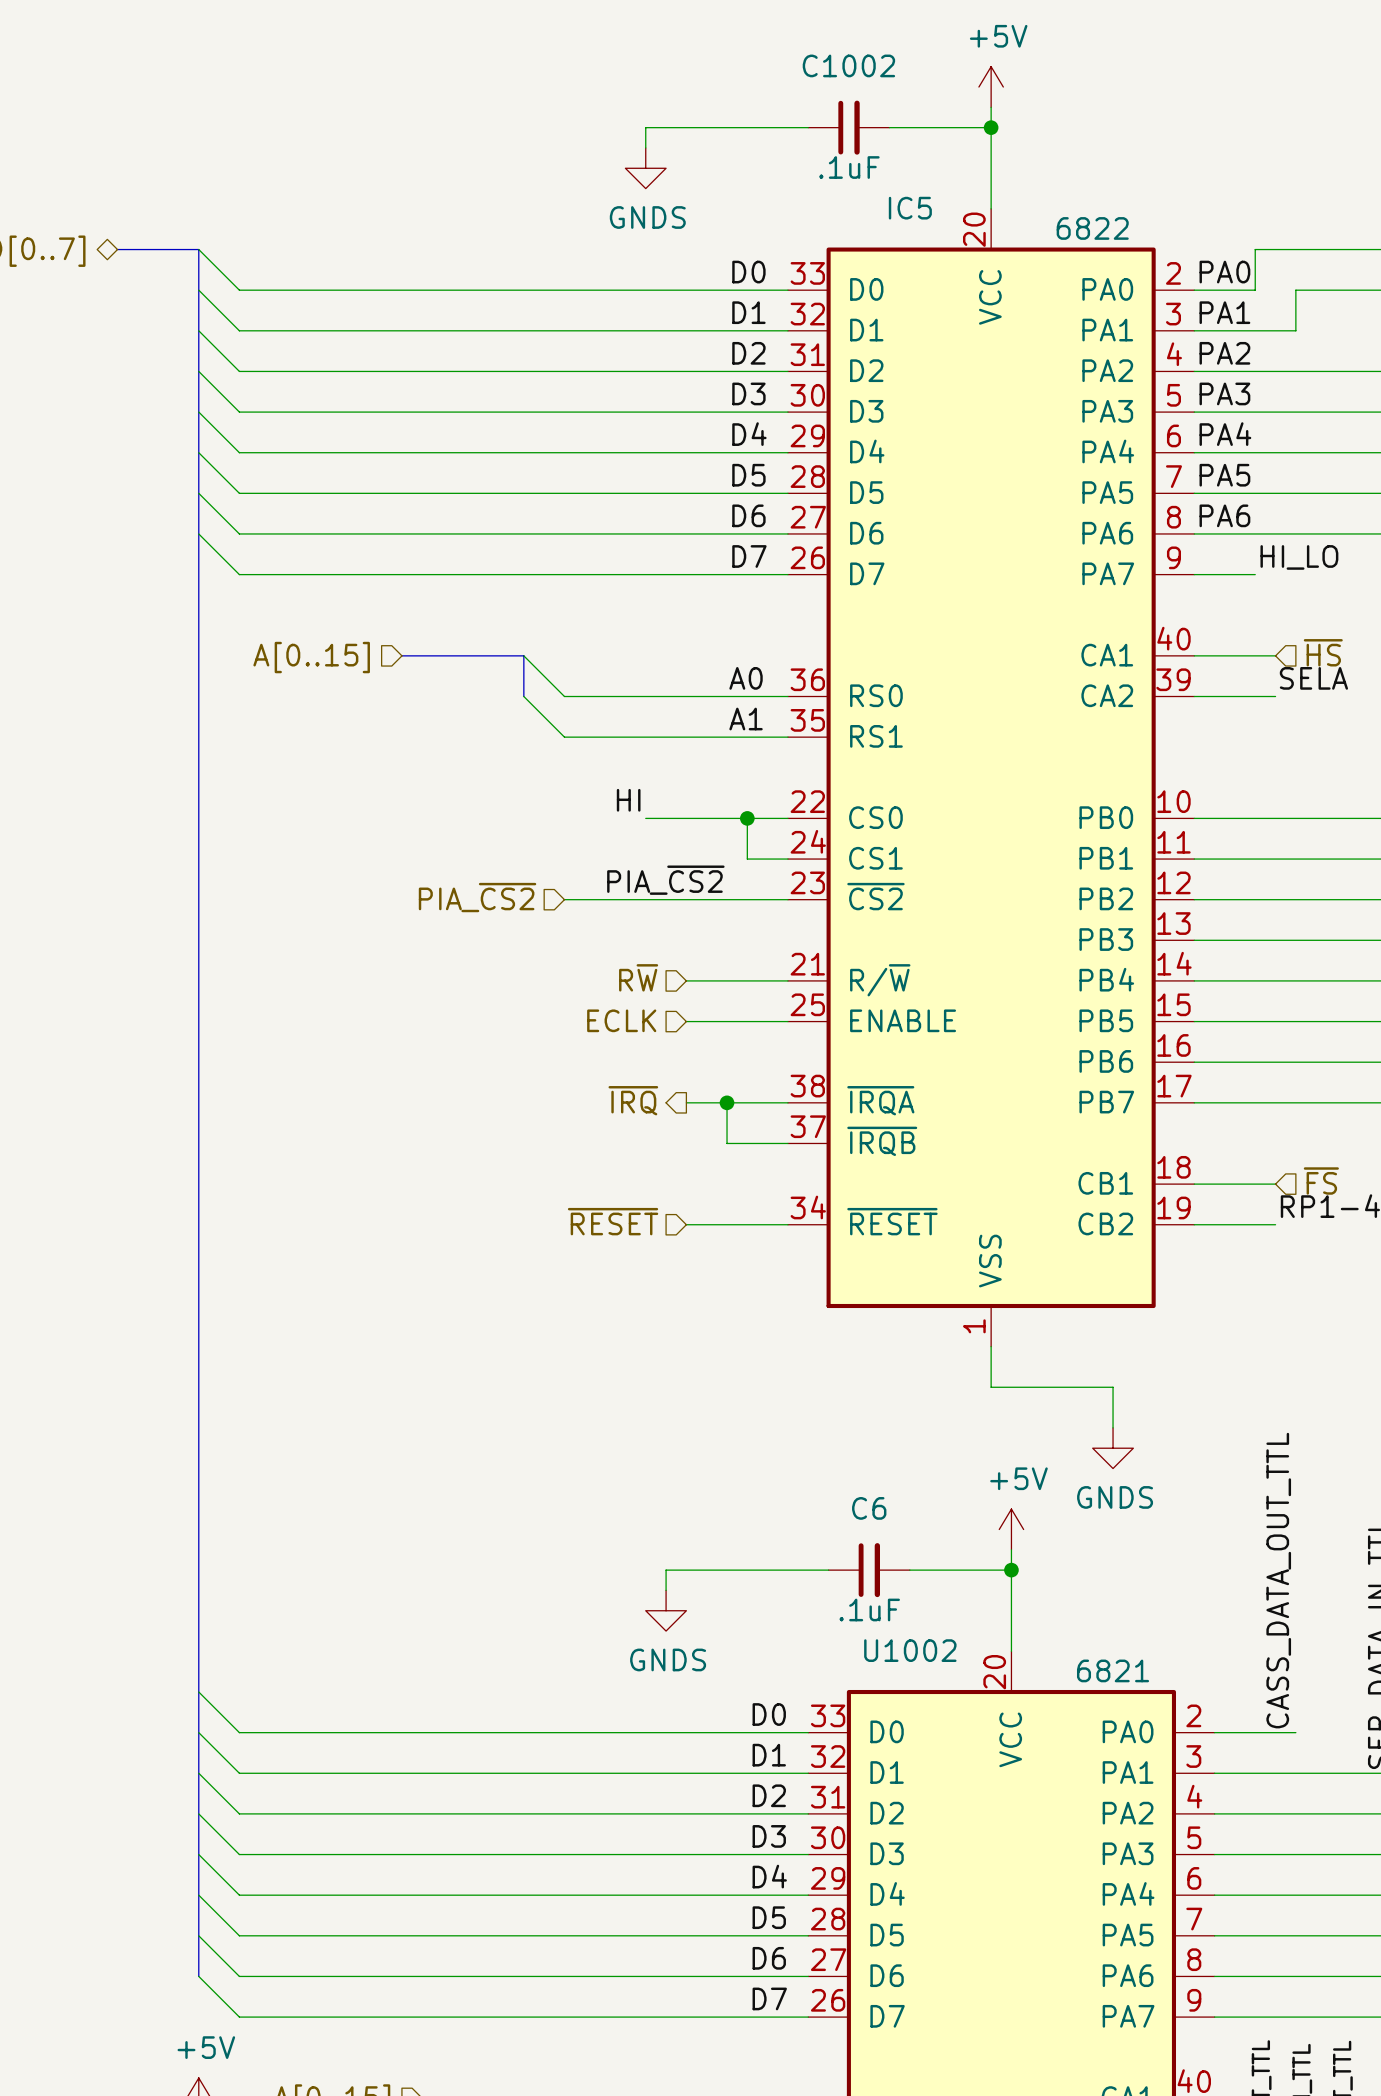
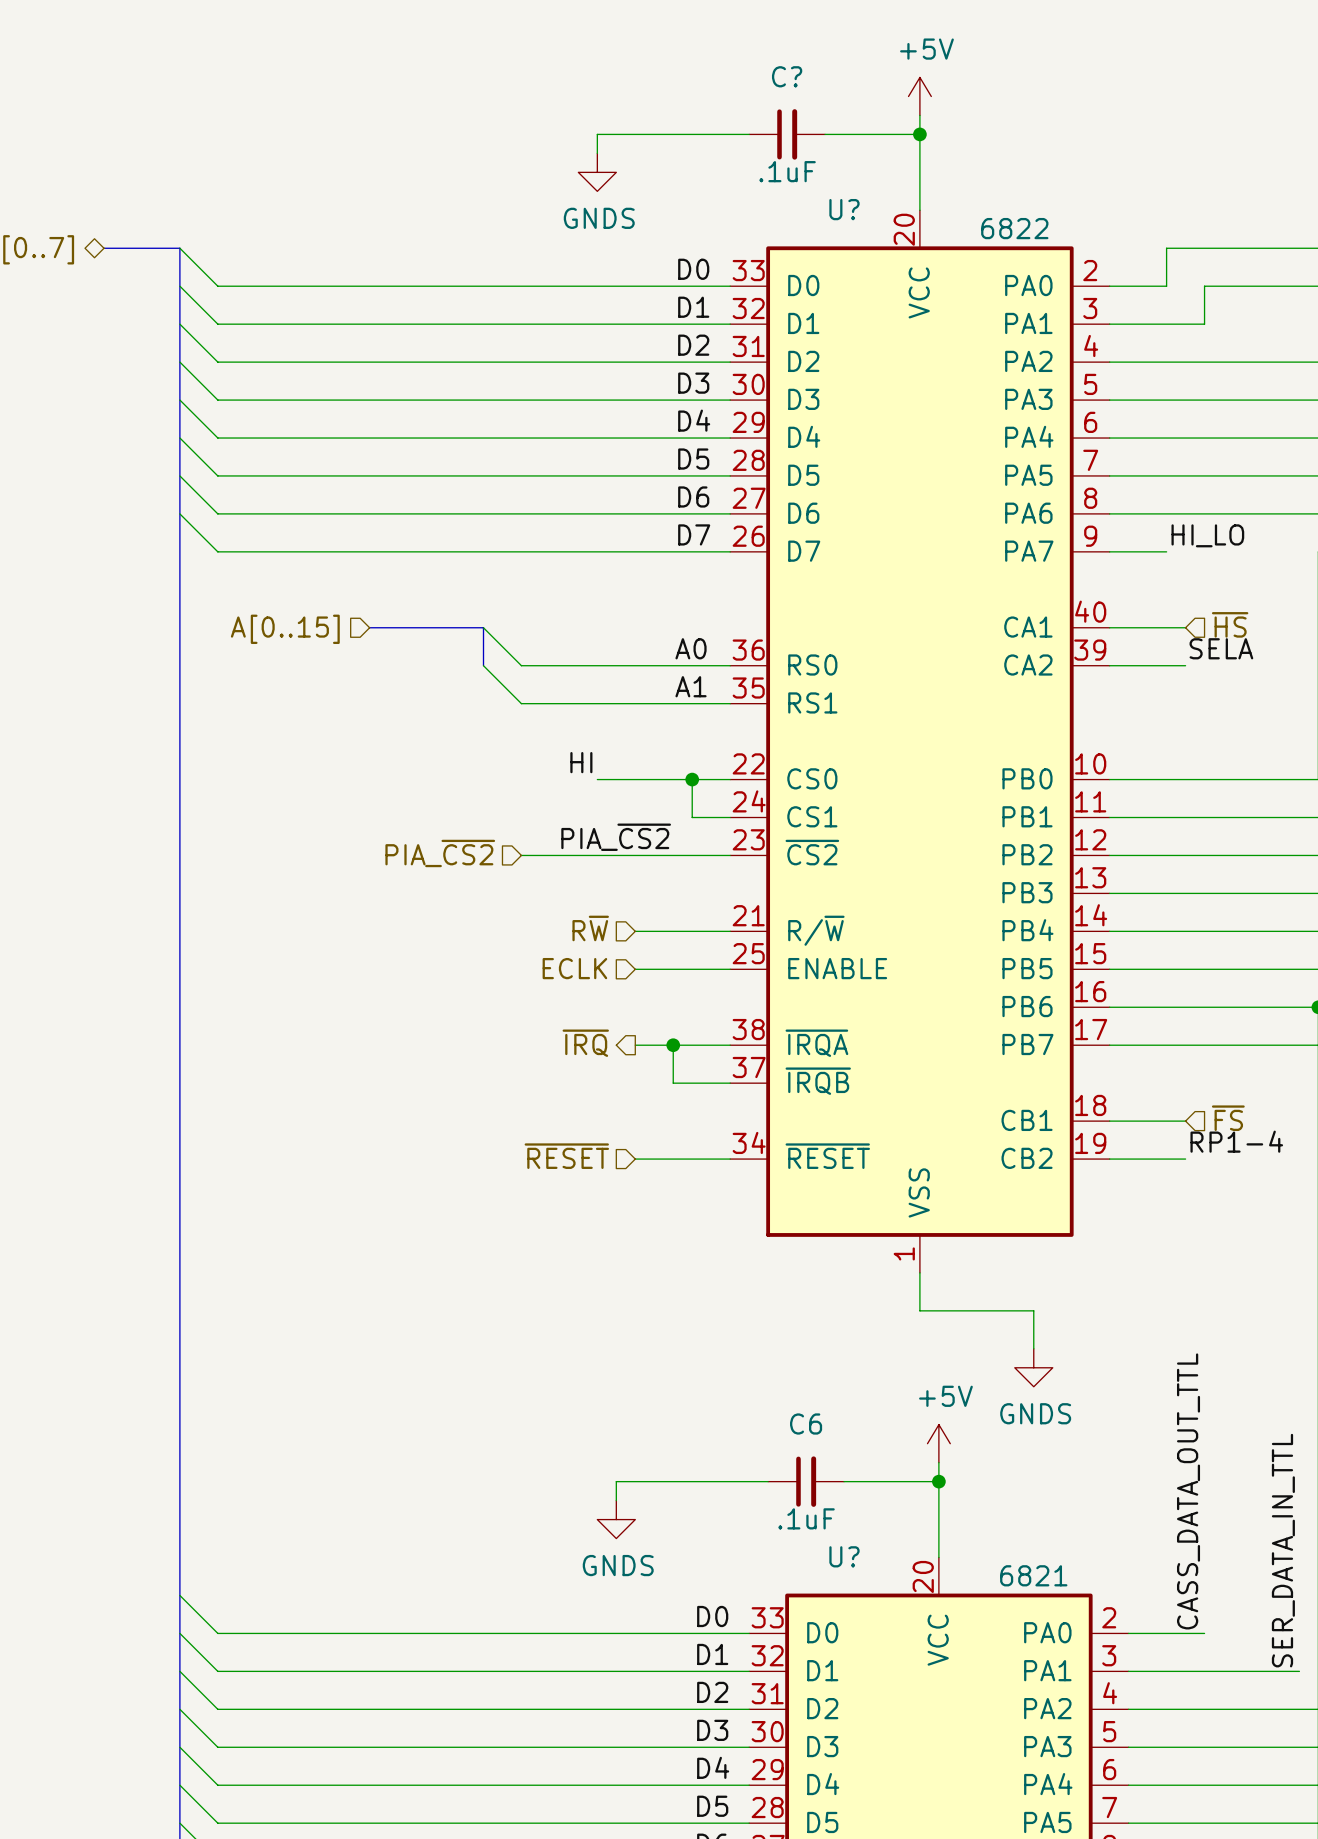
C1002 name: C1002 (848, 65) -> C? (787, 76)
IC5 name: IC5 (910, 208) -> U? (844, 209)
label: PA0 (1224, 272) -> none
label: PA1 (1224, 312) -> none
label: PA2 (1224, 353) -> none
label: PA3 (1224, 393) -> none
label: PA4 (1225, 434) -> none
label: PA5 (1224, 475) -> none
label: PA6 (1224, 515) -> none
U1002 name: U1002 (910, 1650) -> U? (844, 1556)

